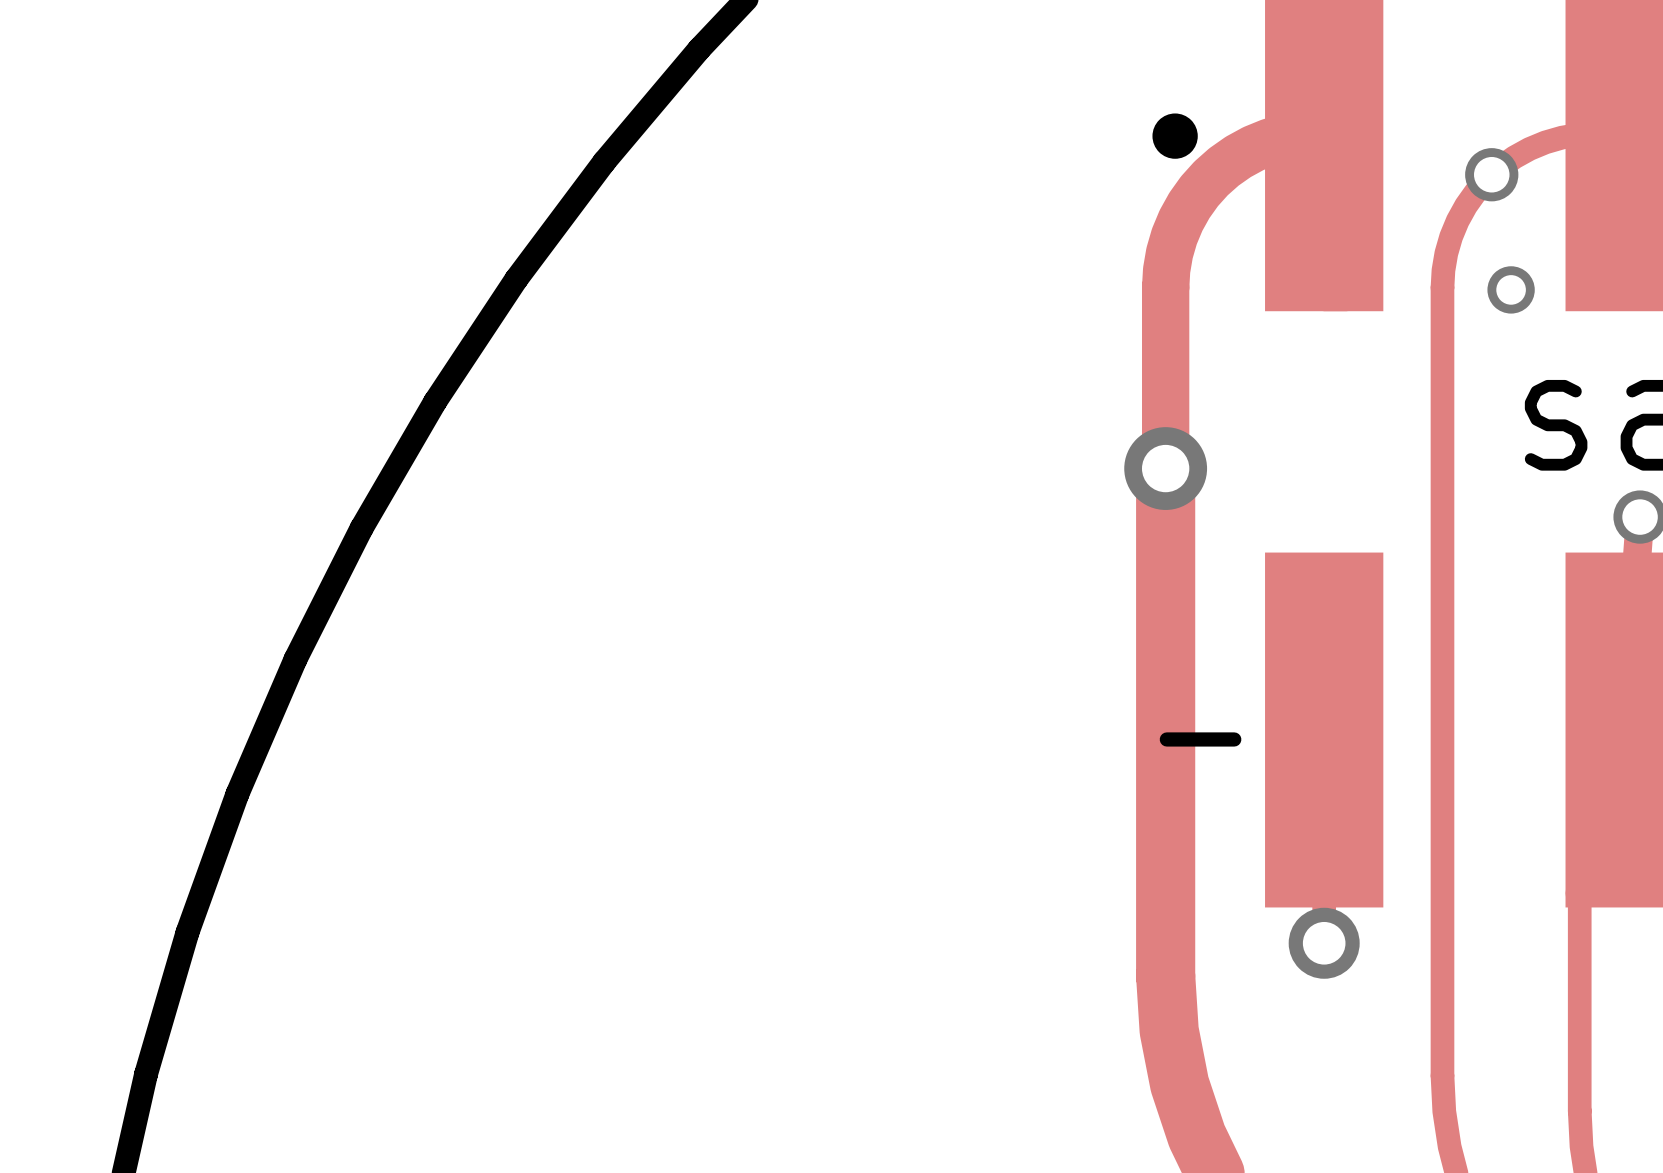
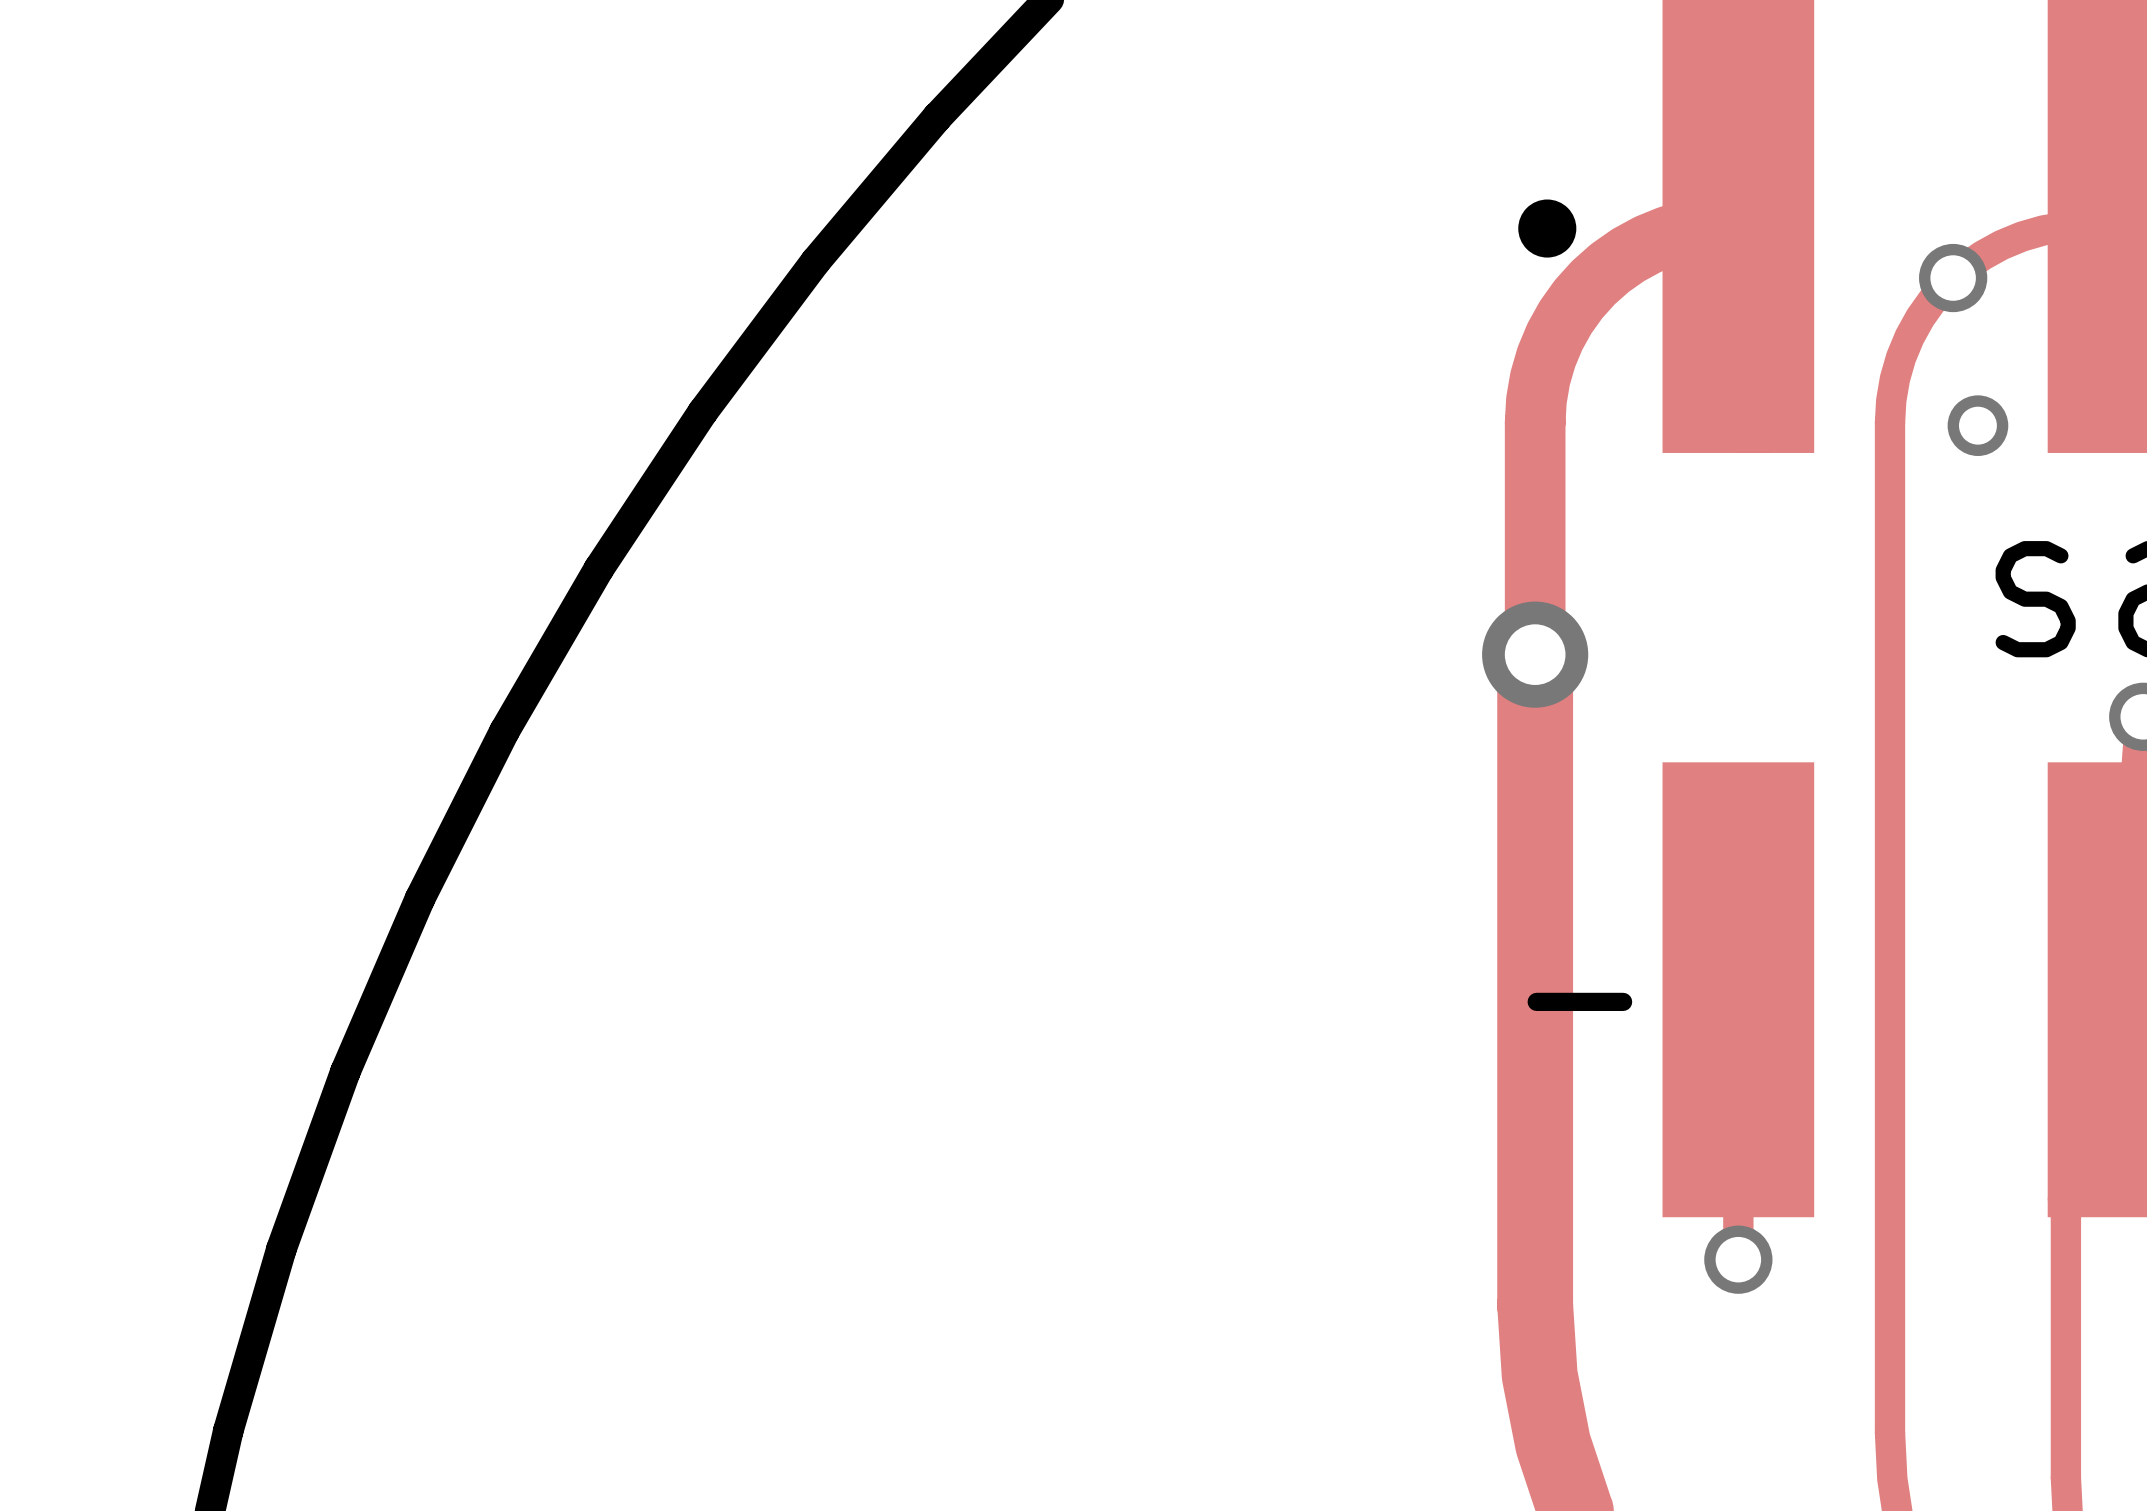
via size: [1288, 907, 1360, 979] -> [1704, 1225, 1773, 1294]

